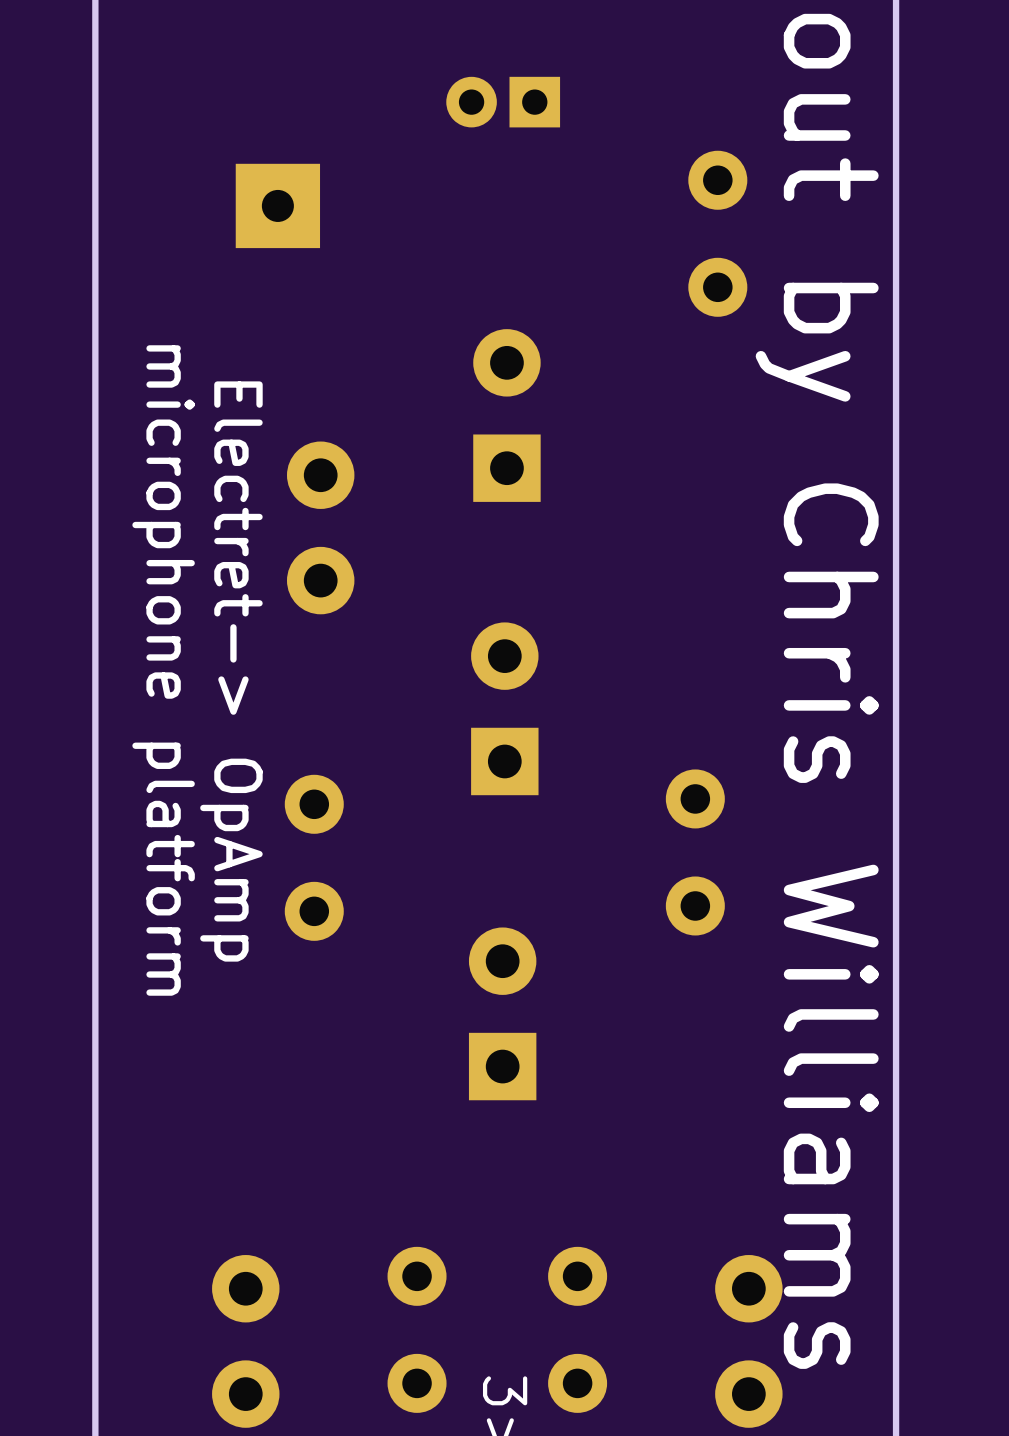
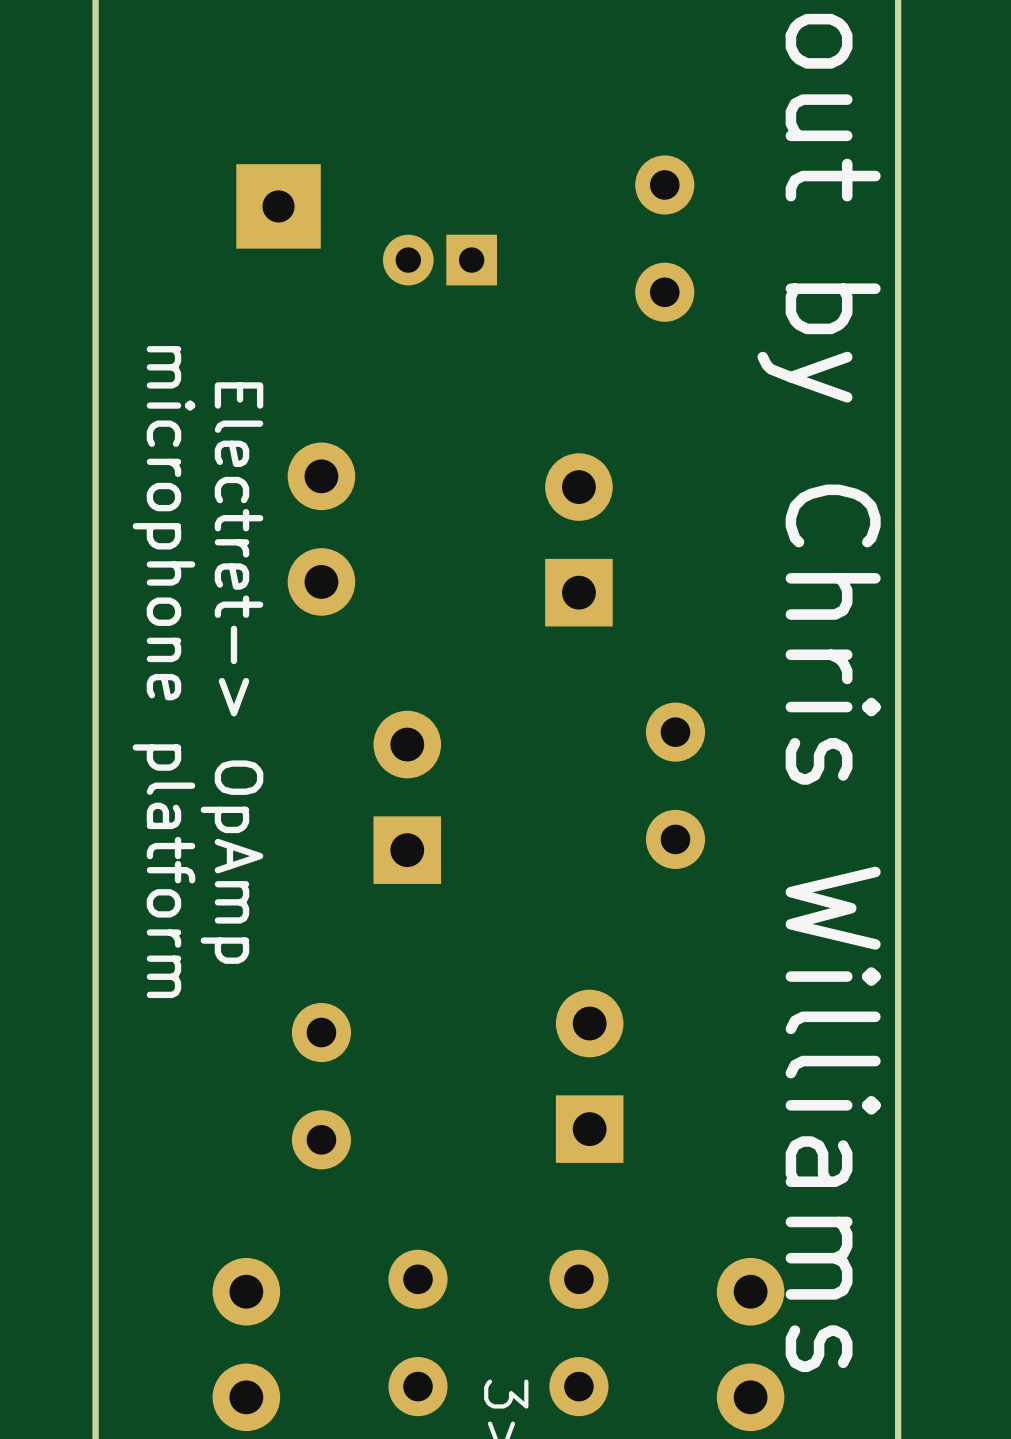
part position: (503, 102) -> (439, 260)
part position: (717, 233) -> (664, 238)
part: (506, 415) -> none
part: none -> (578, 539)
part: (504, 708) -> none
part: none -> (407, 797)
part position: (695, 852) -> (675, 785)
part: (314, 857) -> none
part position: (502, 1013) -> (589, 1076)
part: none -> (321, 1086)

